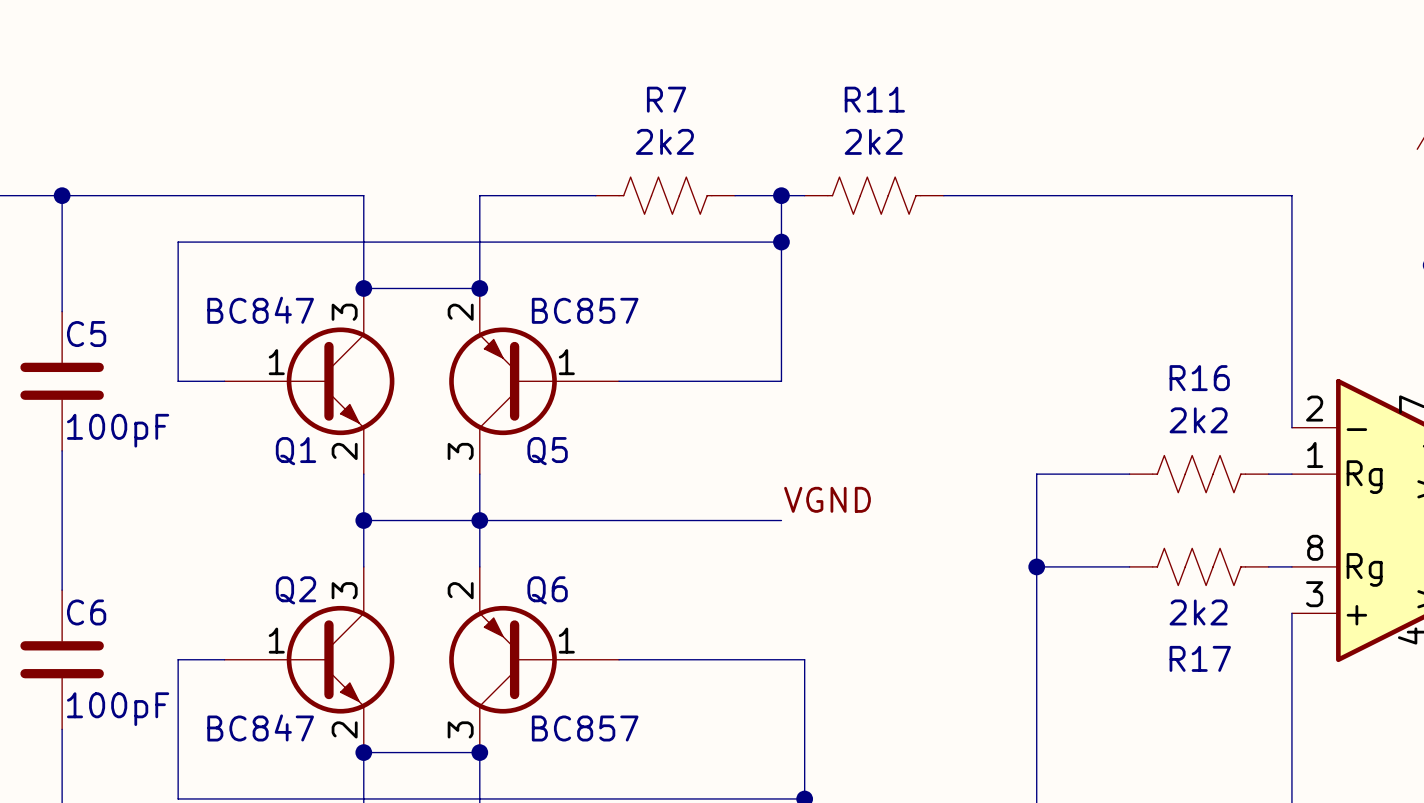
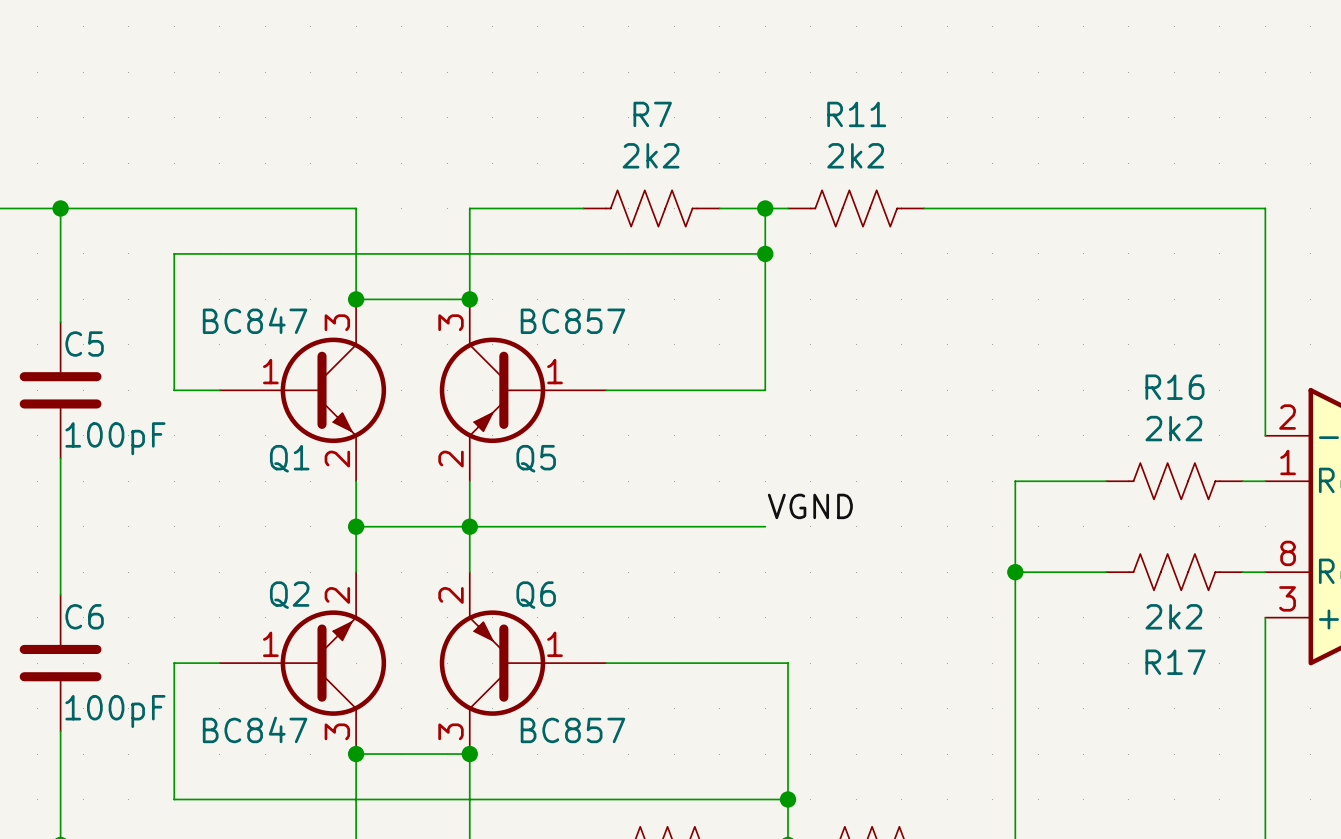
Q5 flip: as is (503, 381) -> up-down (492, 390)
Q2 flip: as is (340, 659) -> up-down (333, 663)

